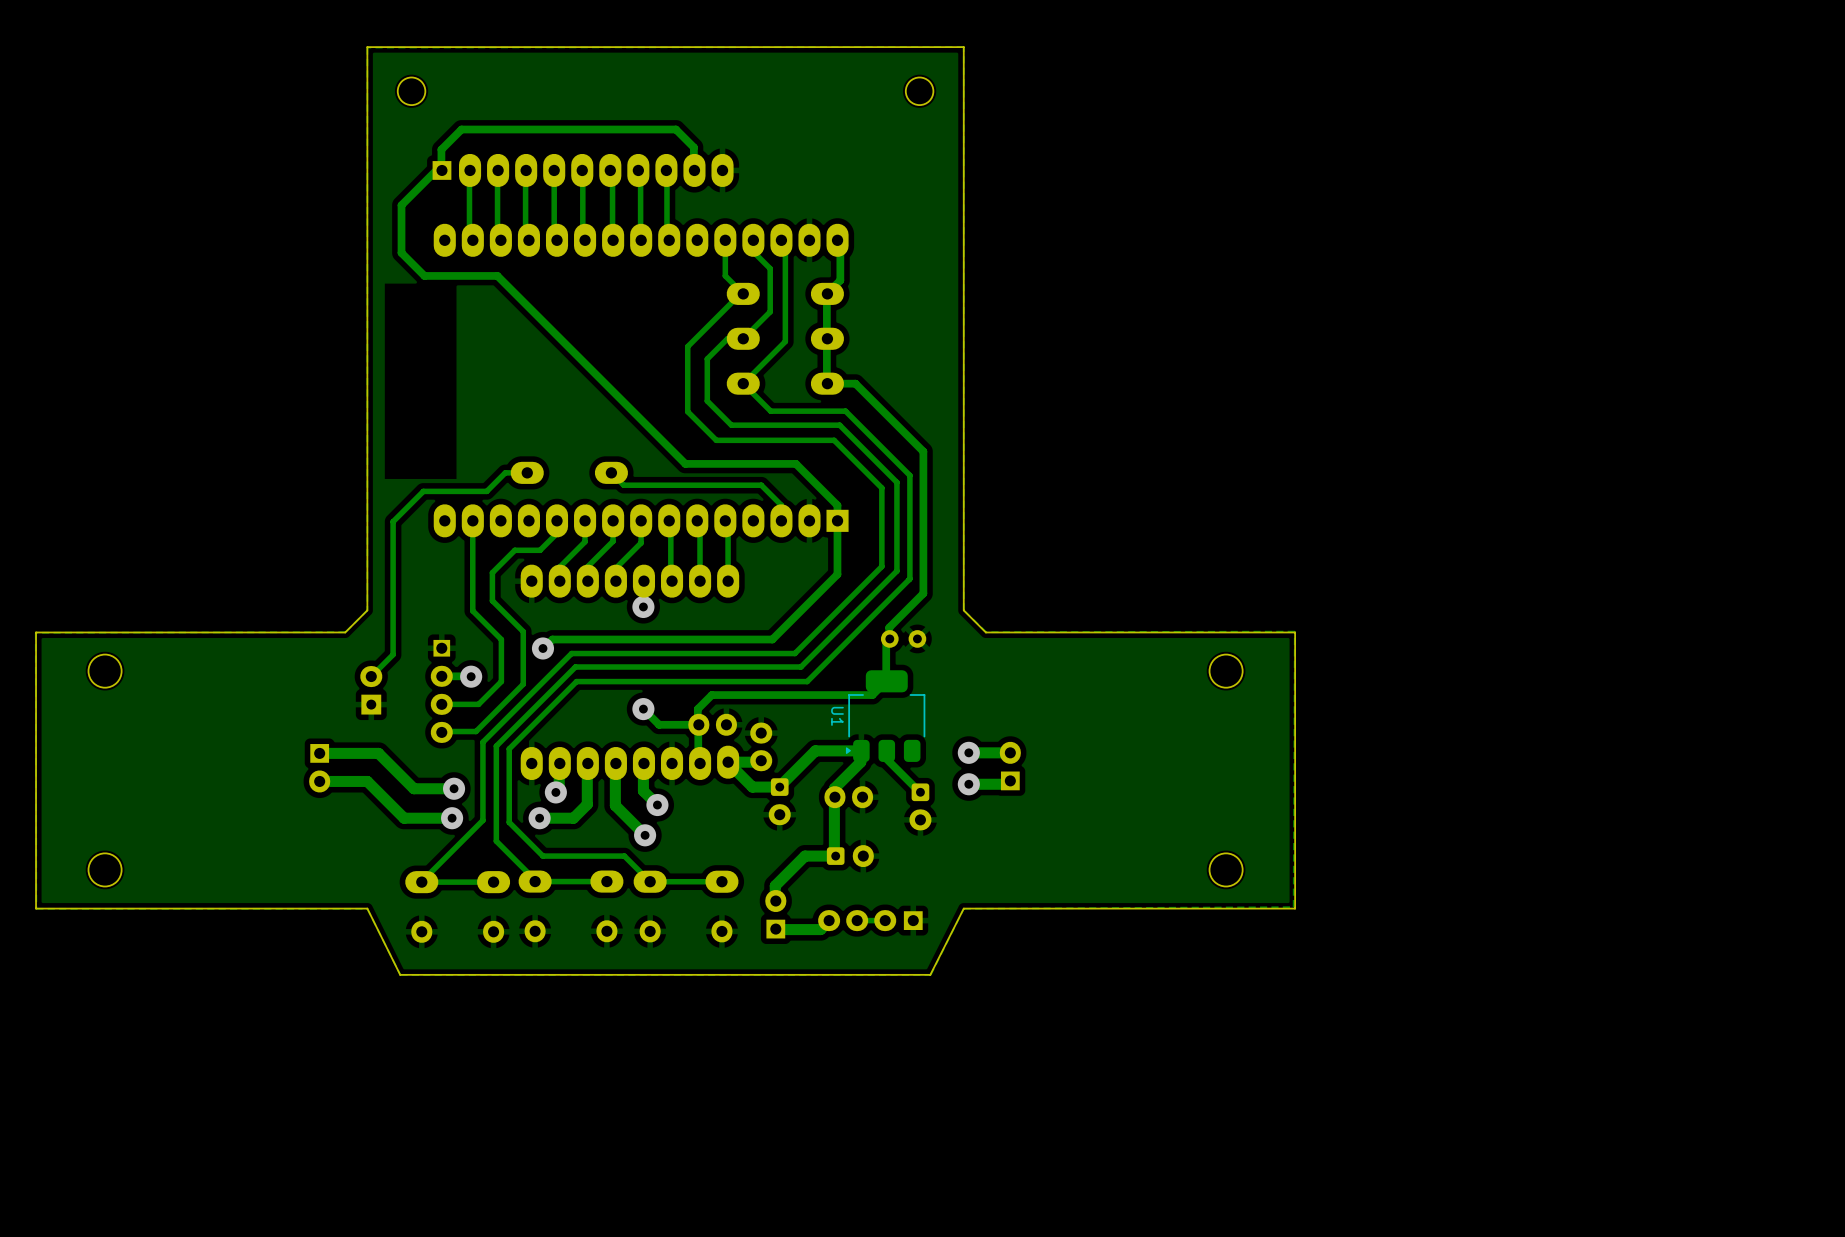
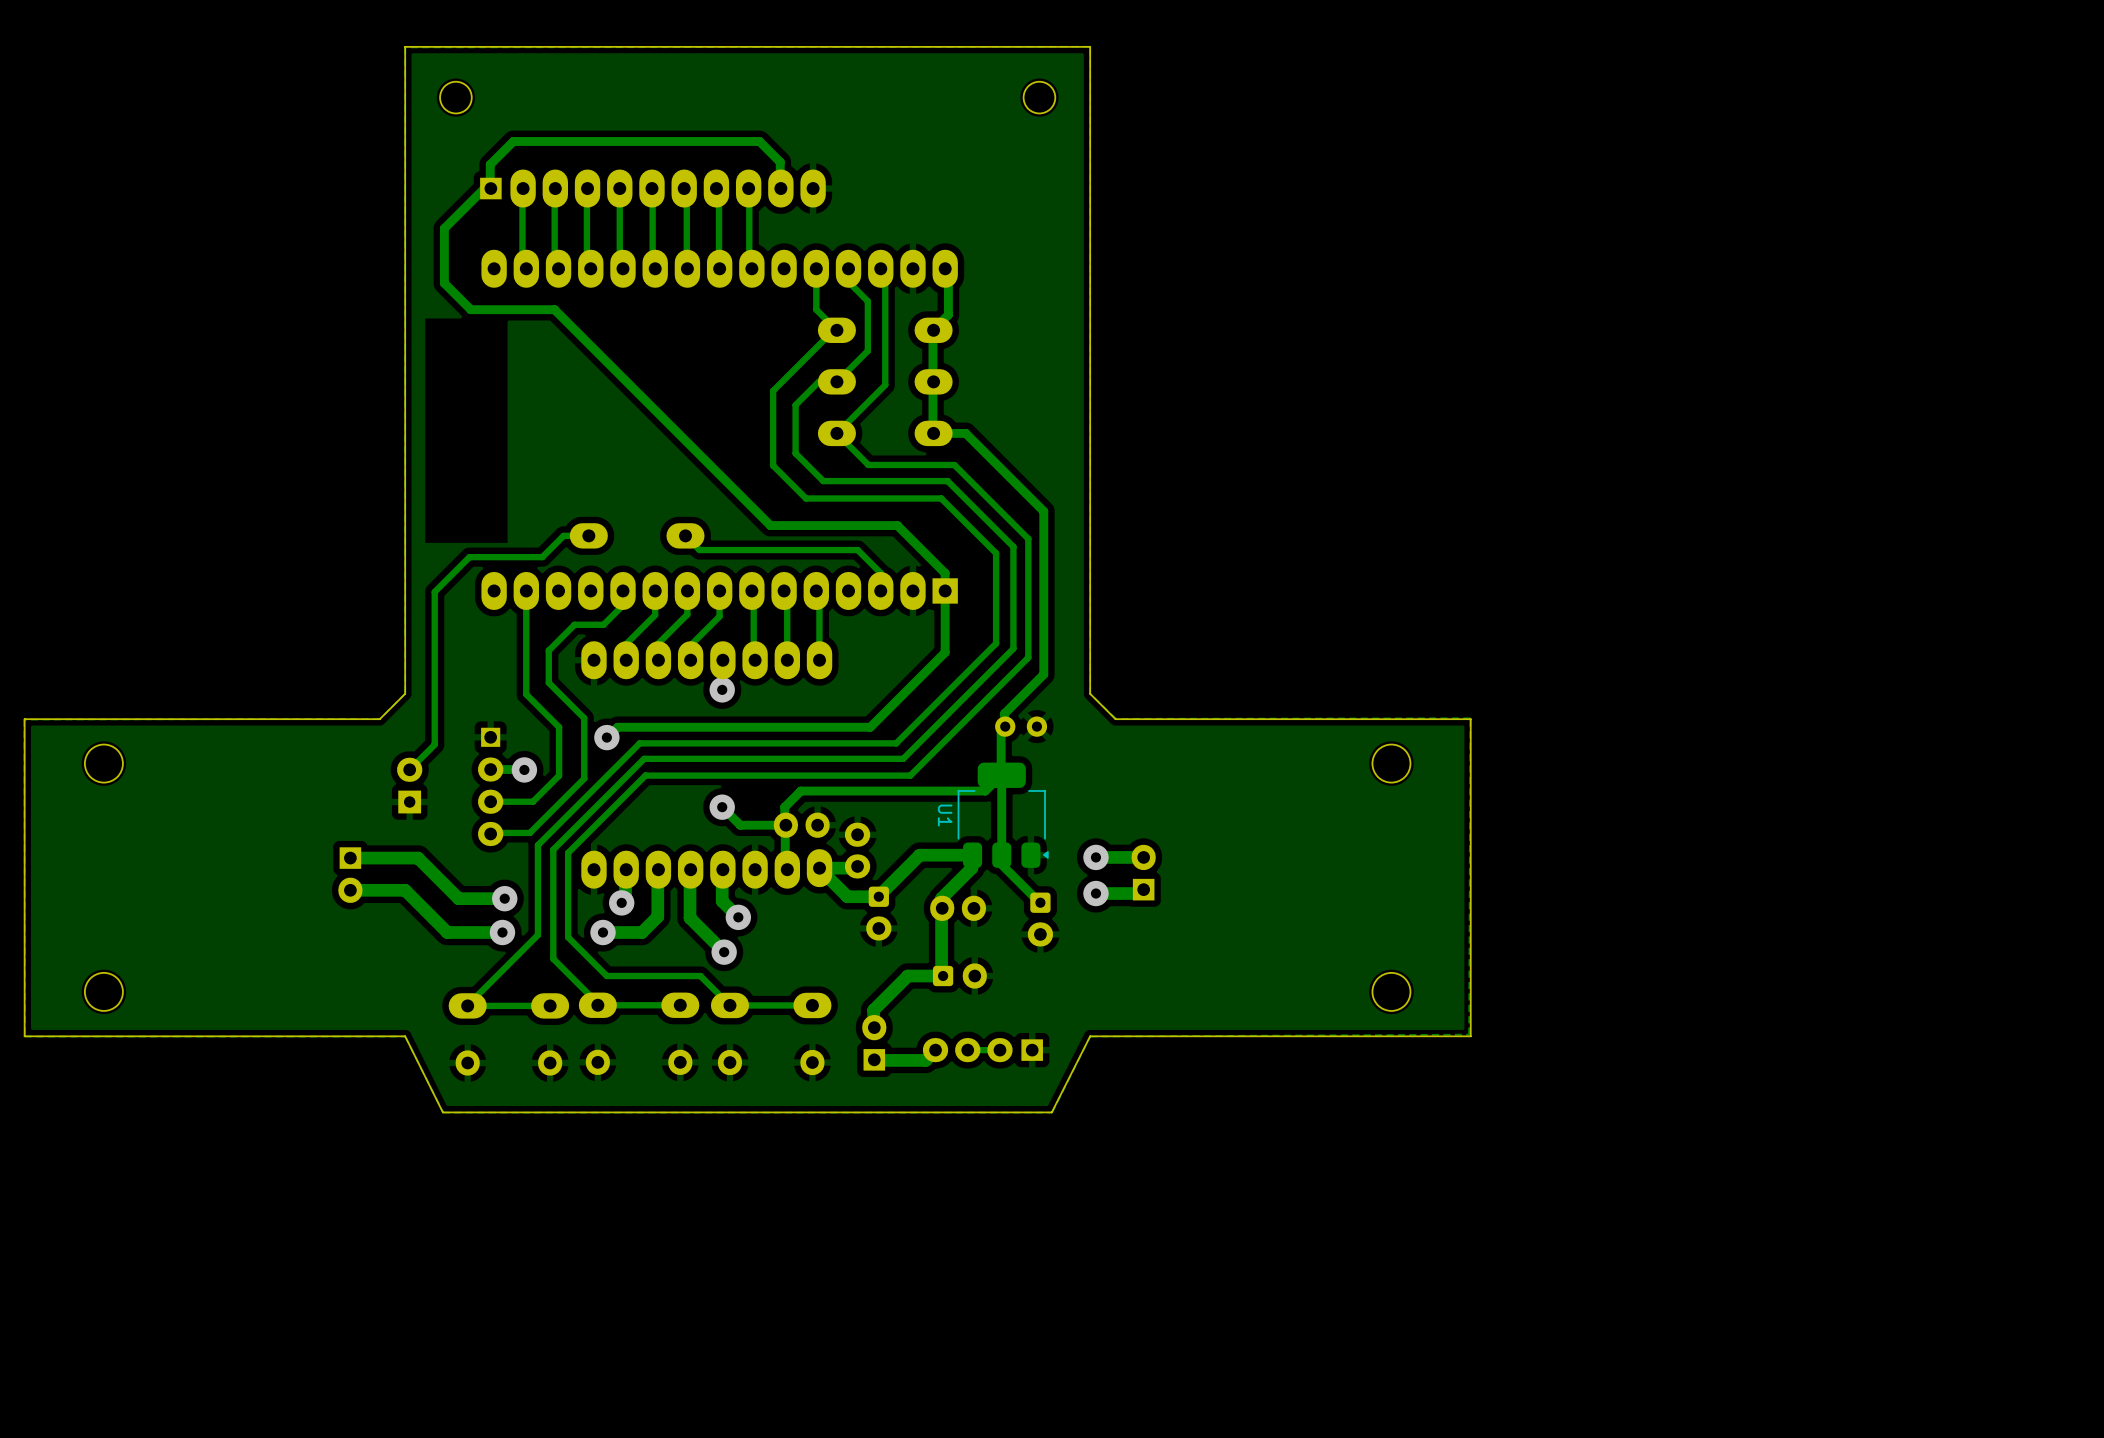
U1 footprint: [845, 670, 926, 762] -> [957, 762, 1049, 868]
track: none -> (1001, 775) (1001, 855)

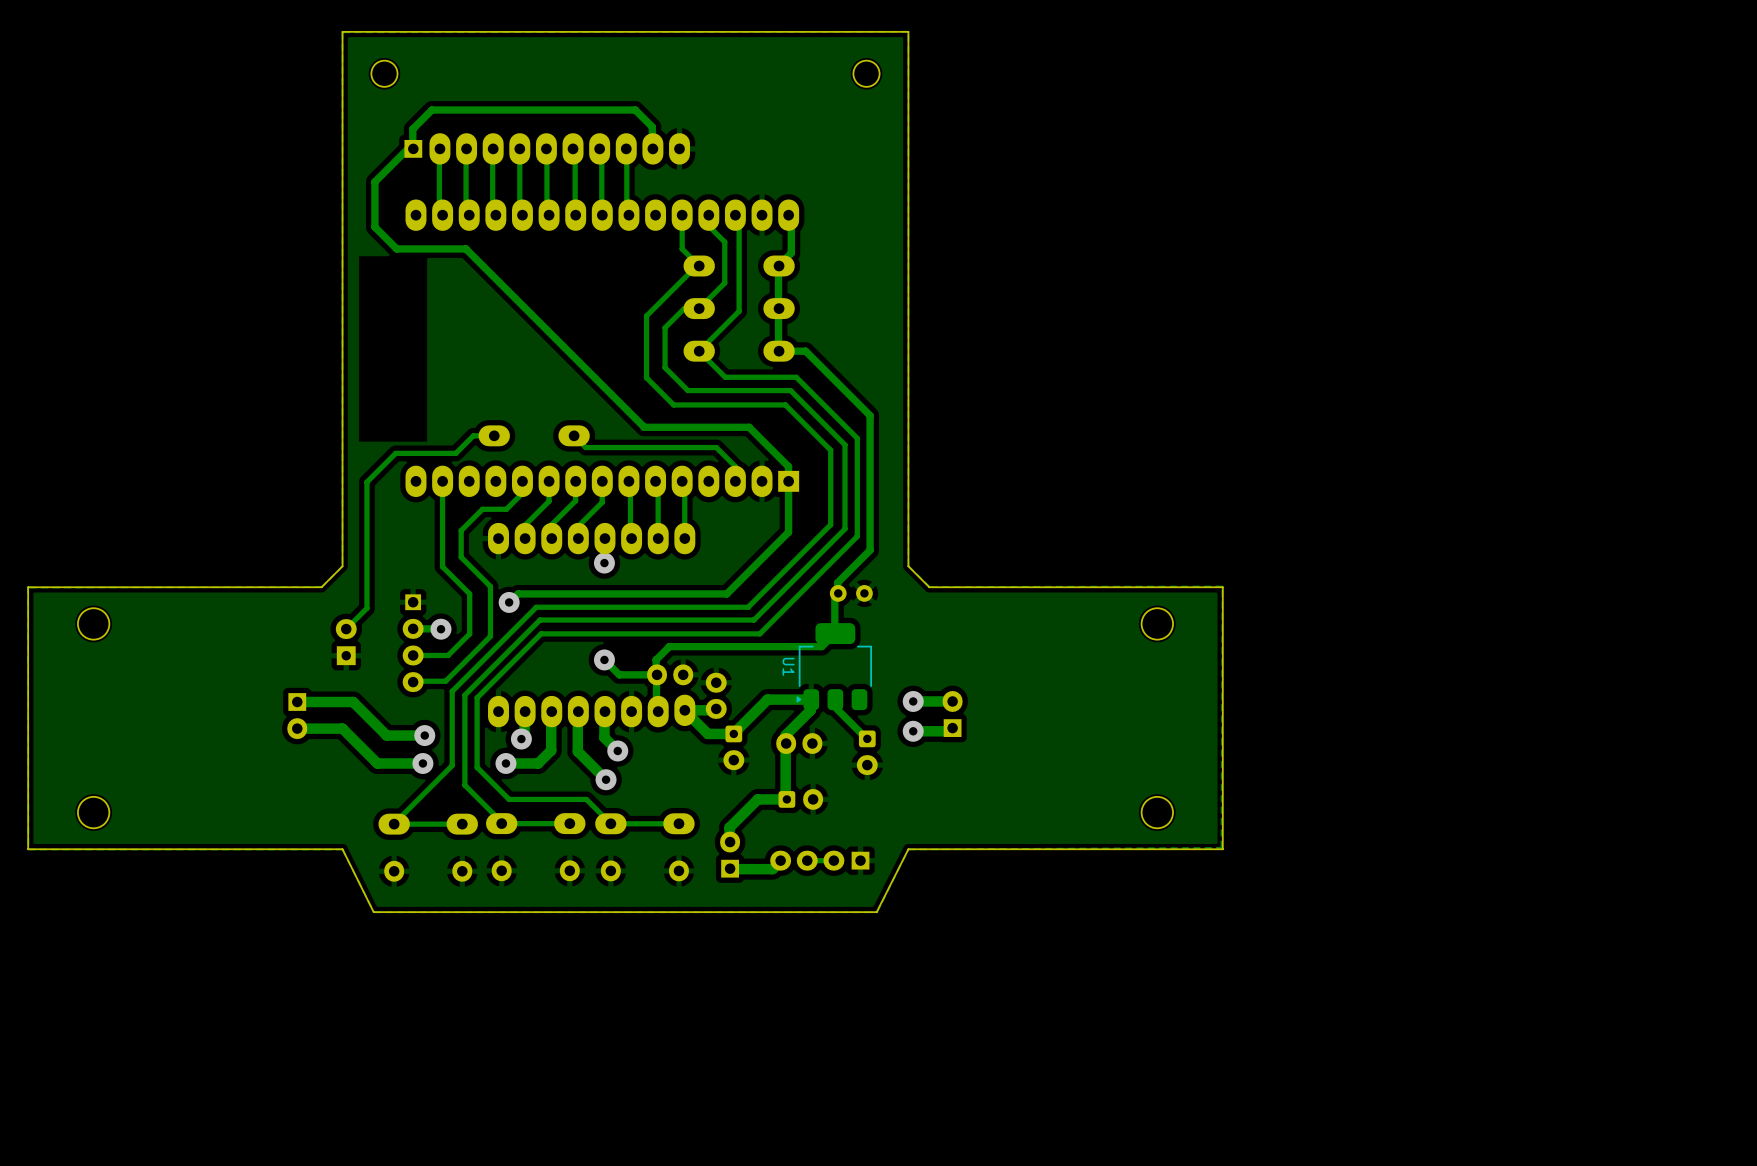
U1 footprint: [957, 762, 1049, 868] -> [796, 623, 872, 711]
track: (1001, 775) (1001, 855) -> none

